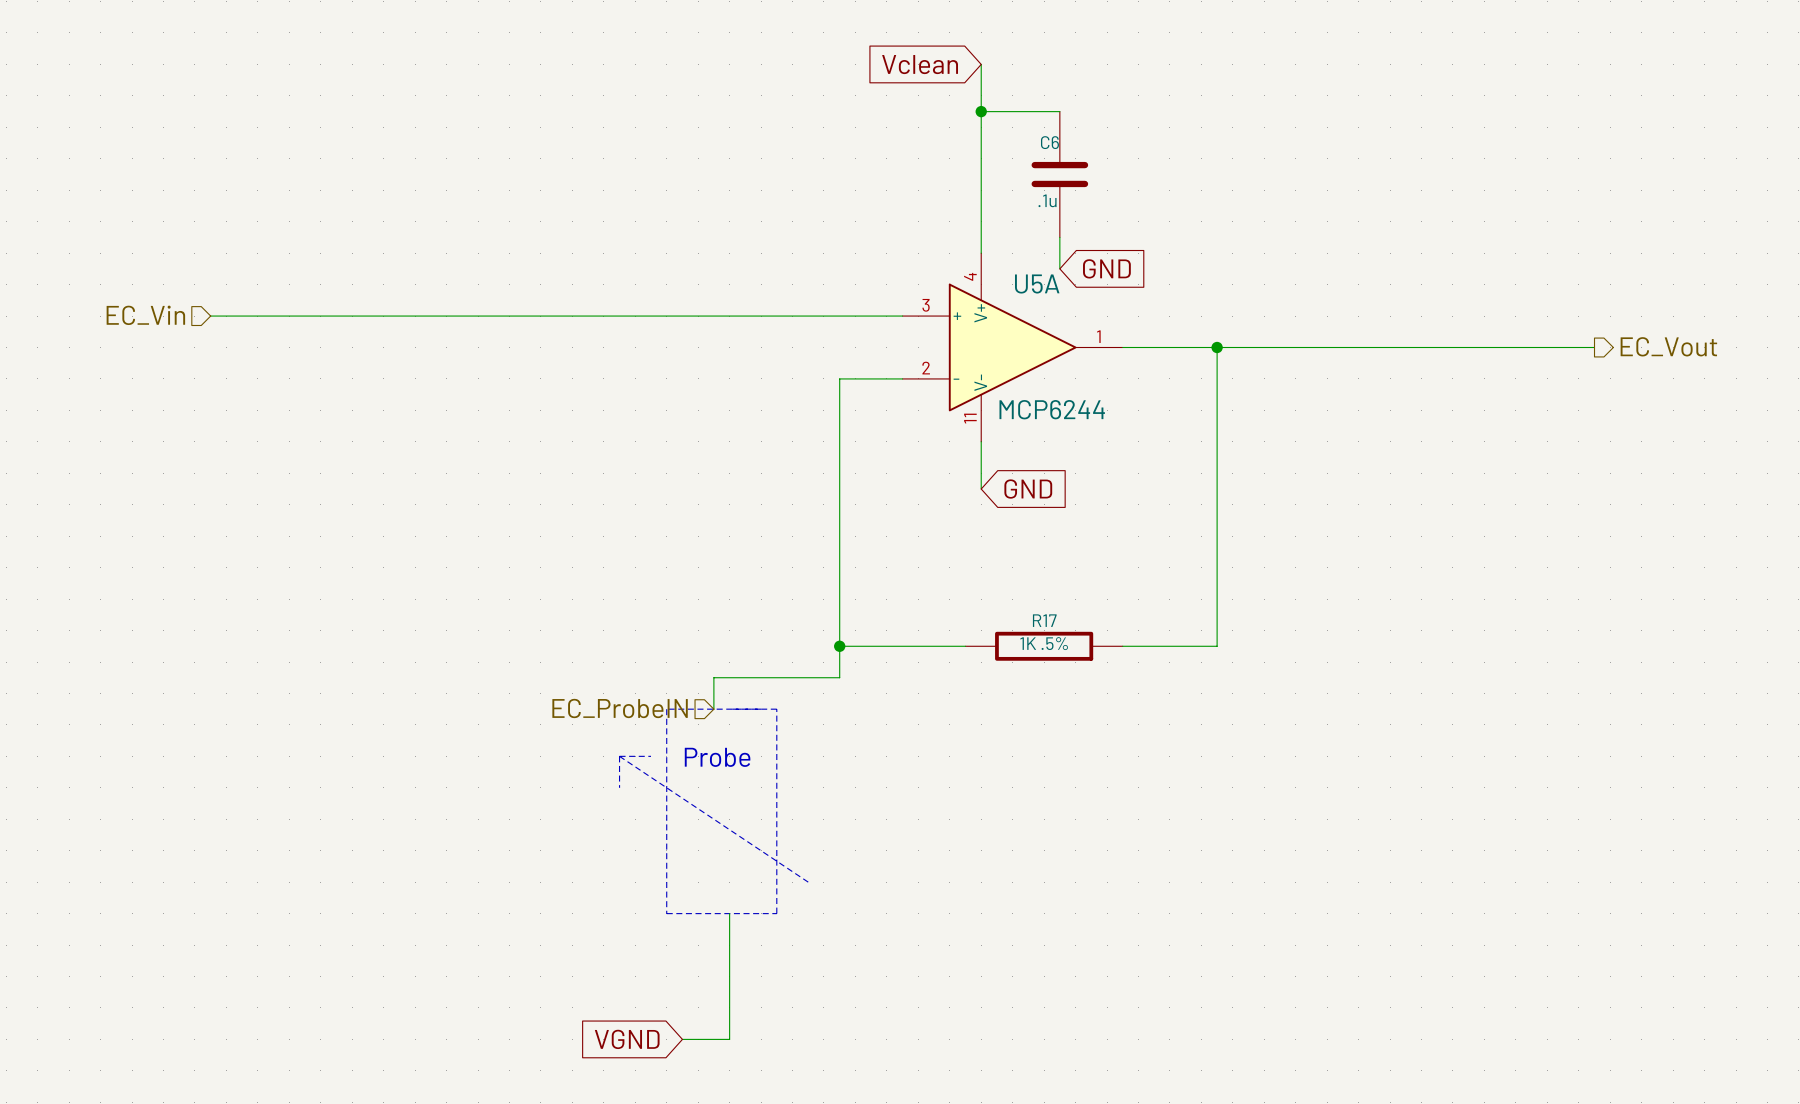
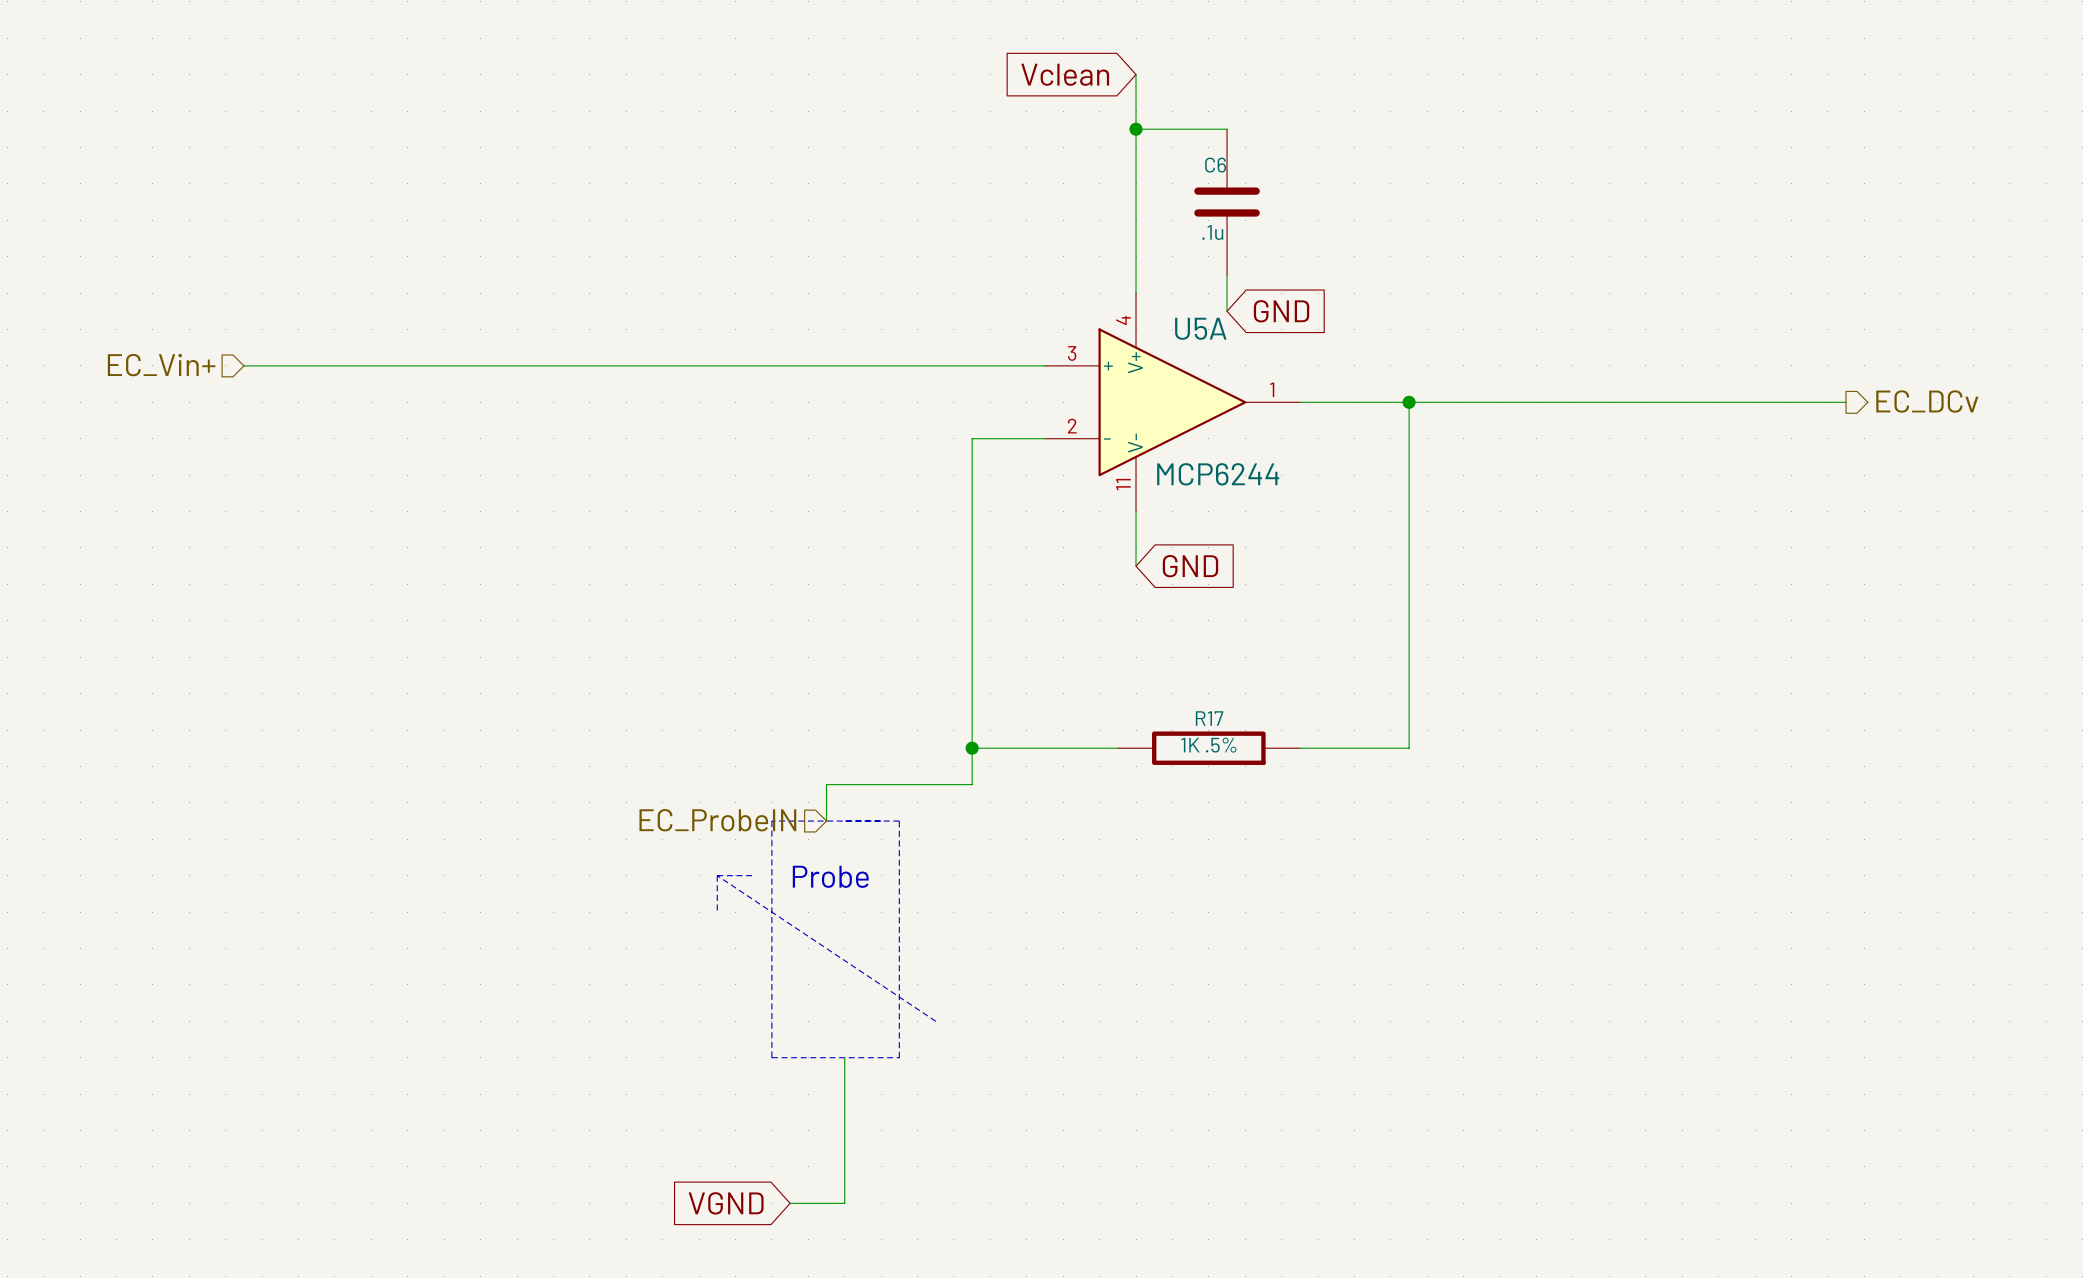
hierarchical label: EC_Vin (145, 315) -> EC_Vin+ (161, 365)
hierarchical label: EC_Vout (1668, 346) -> EC_DCv (1927, 401)

